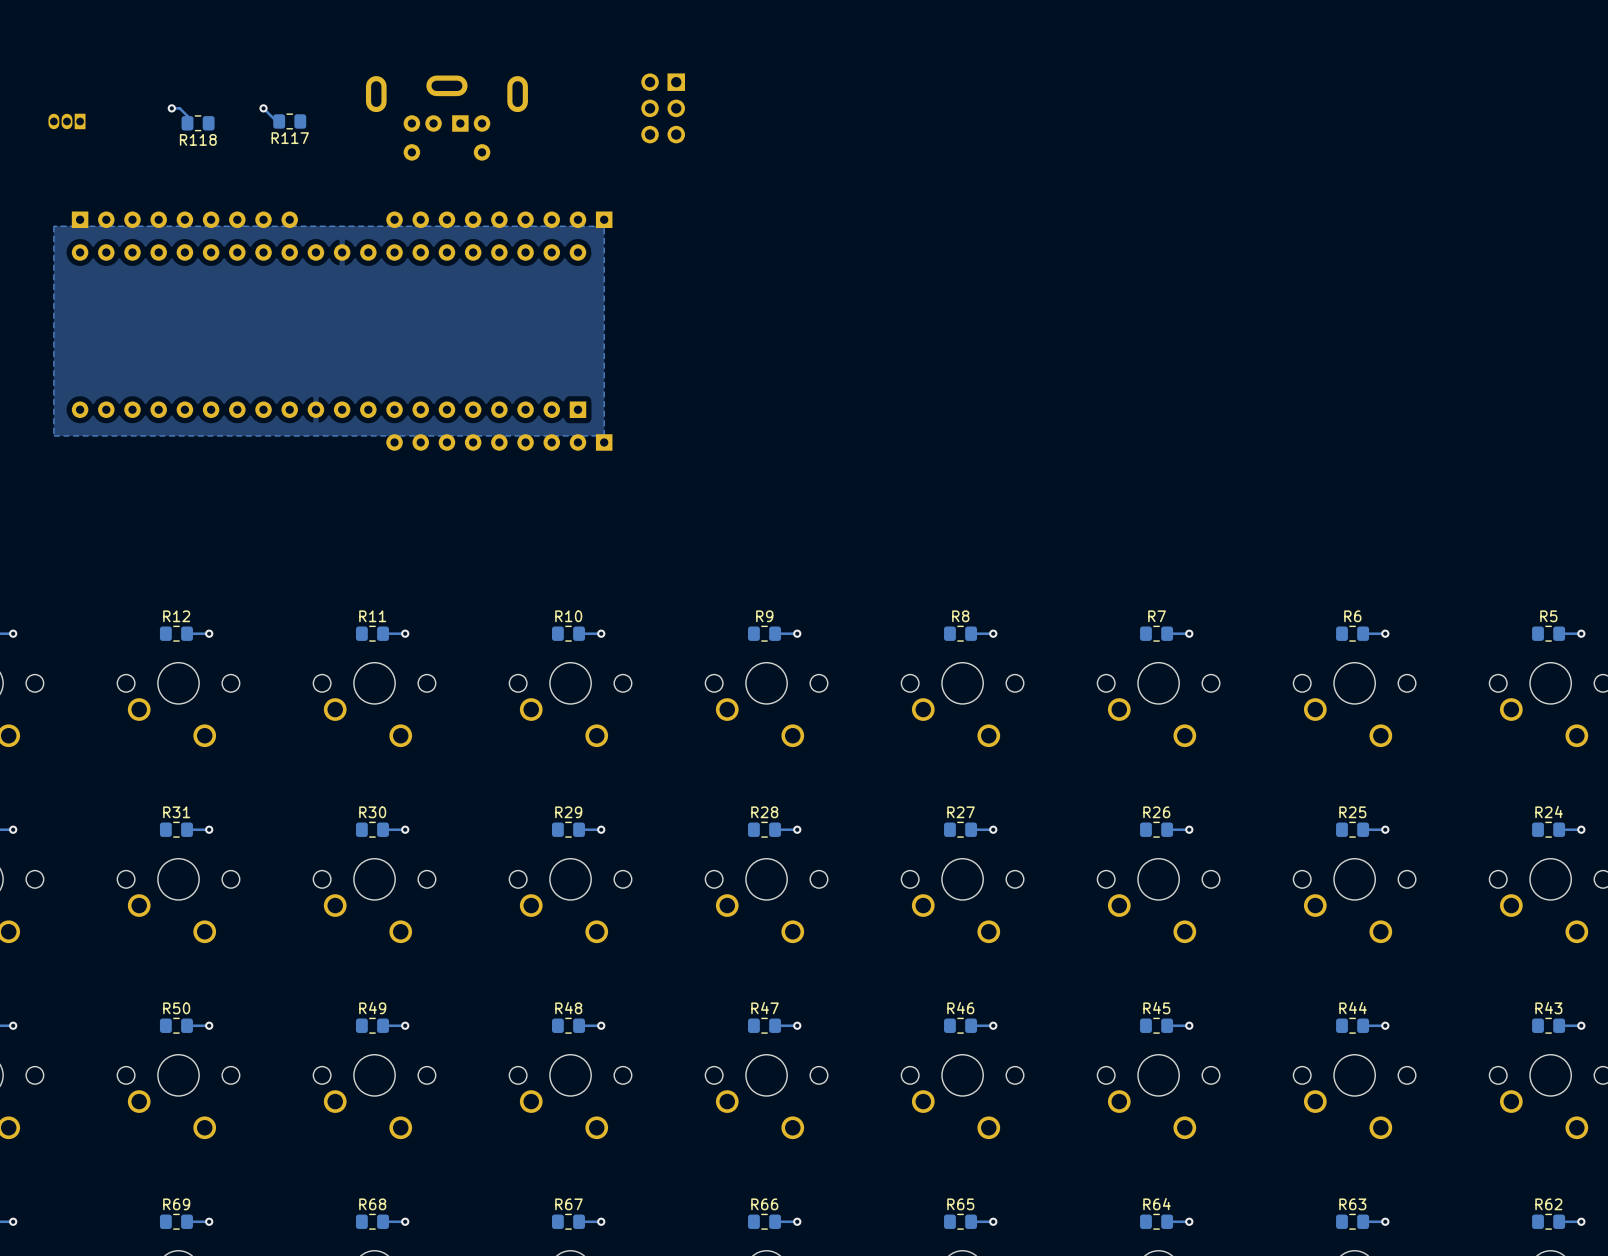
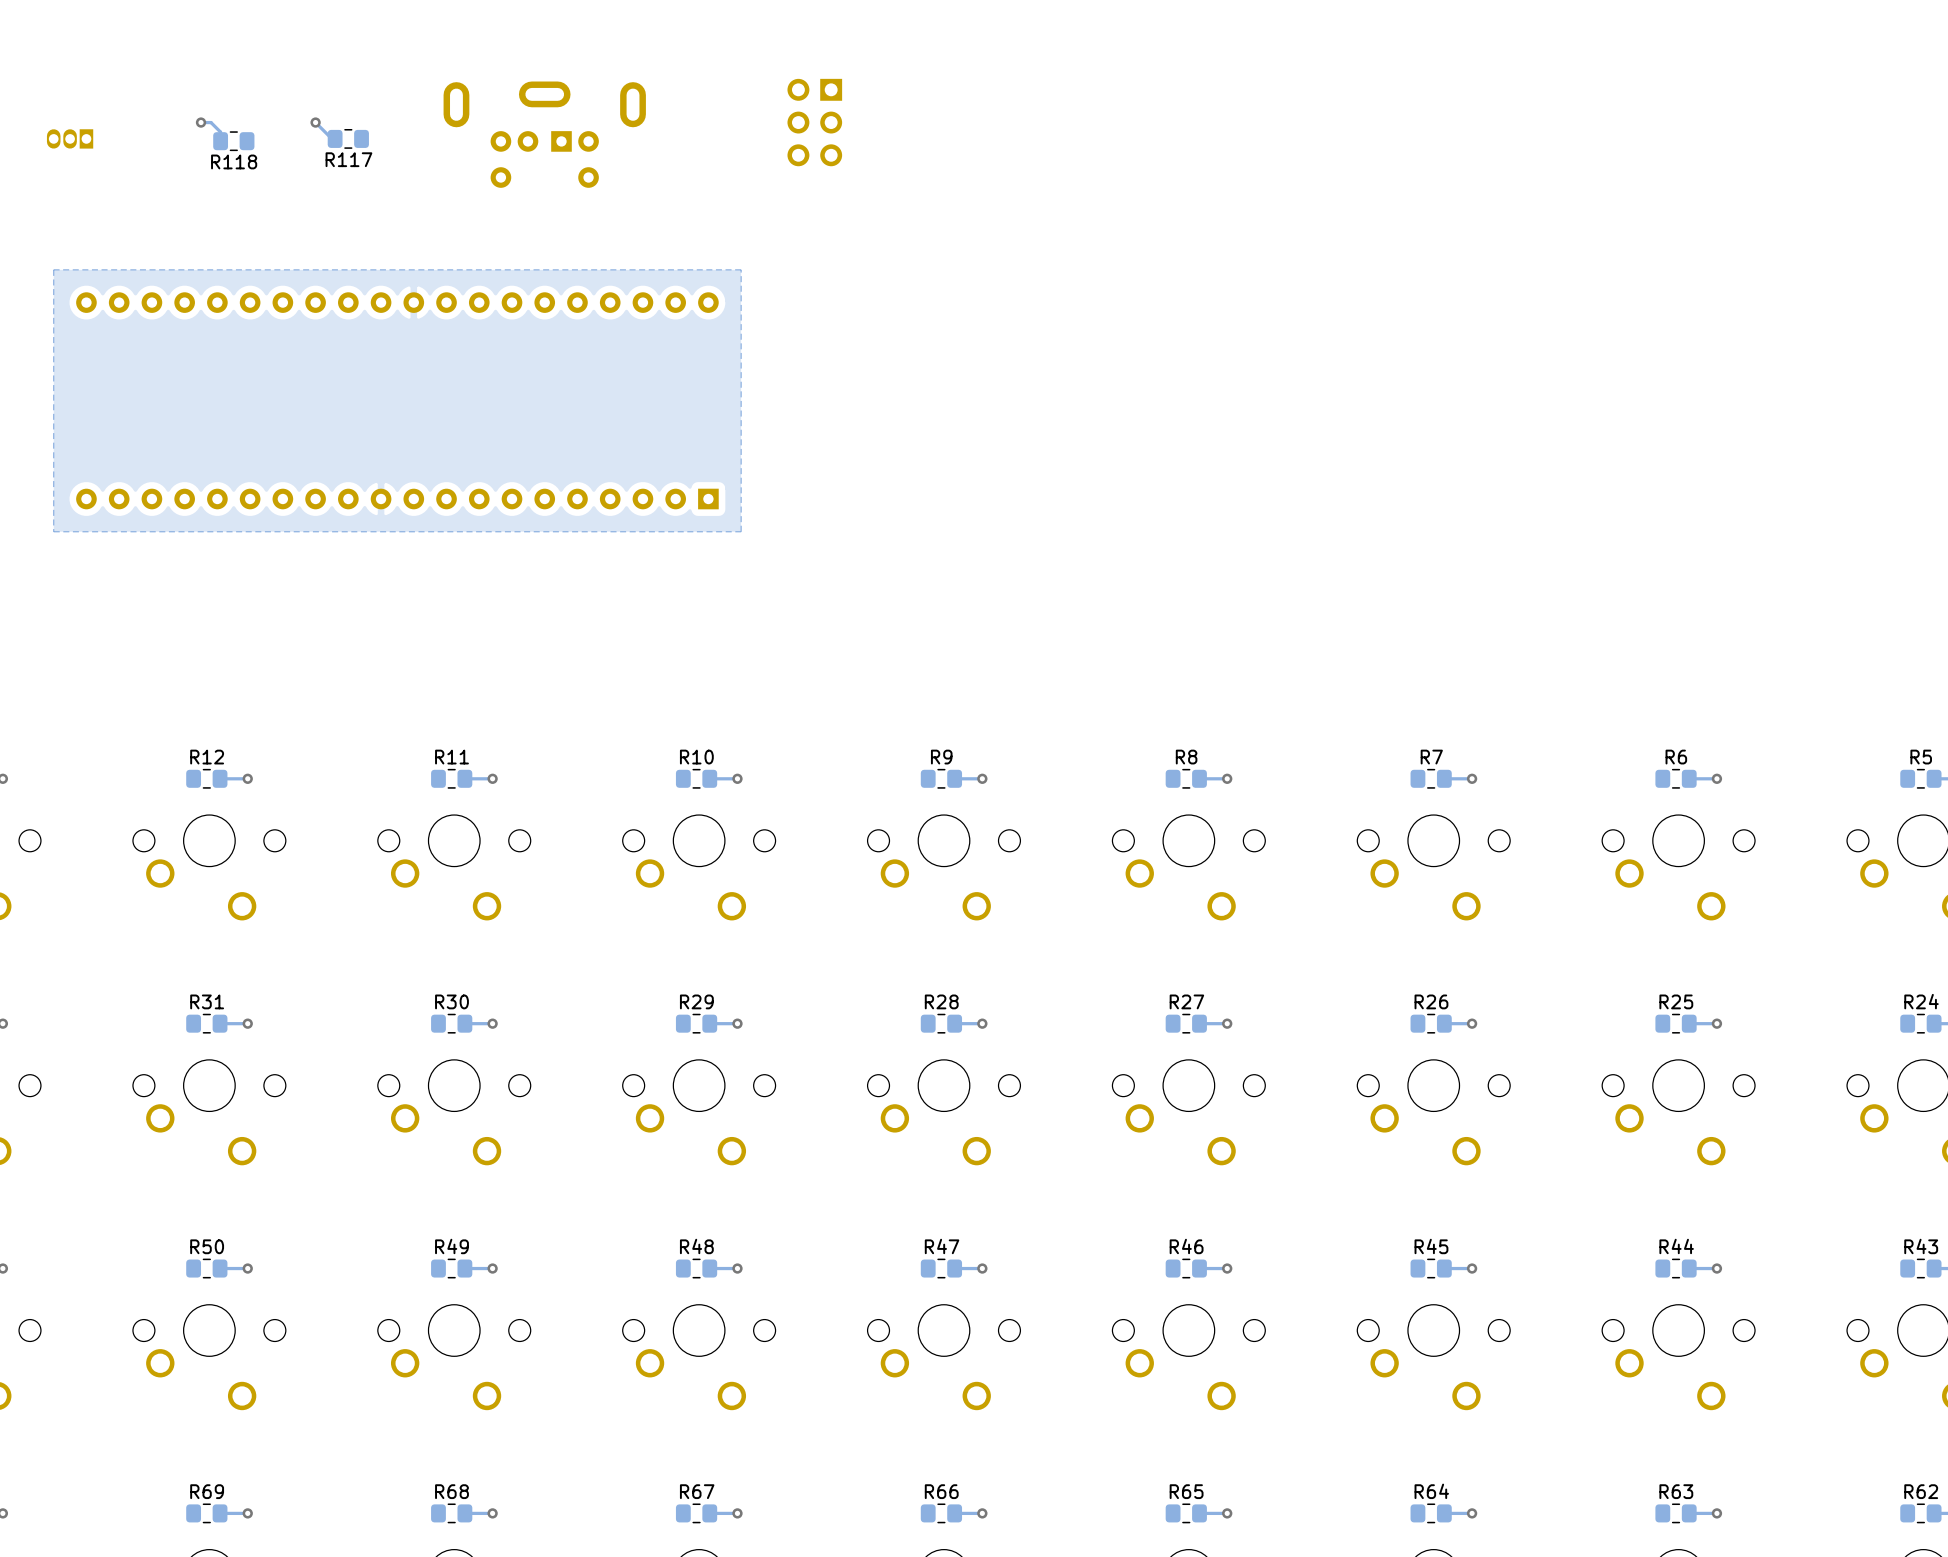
part: (184, 219) -> none
part: (499, 219) -> none
part: (499, 442) -> none

